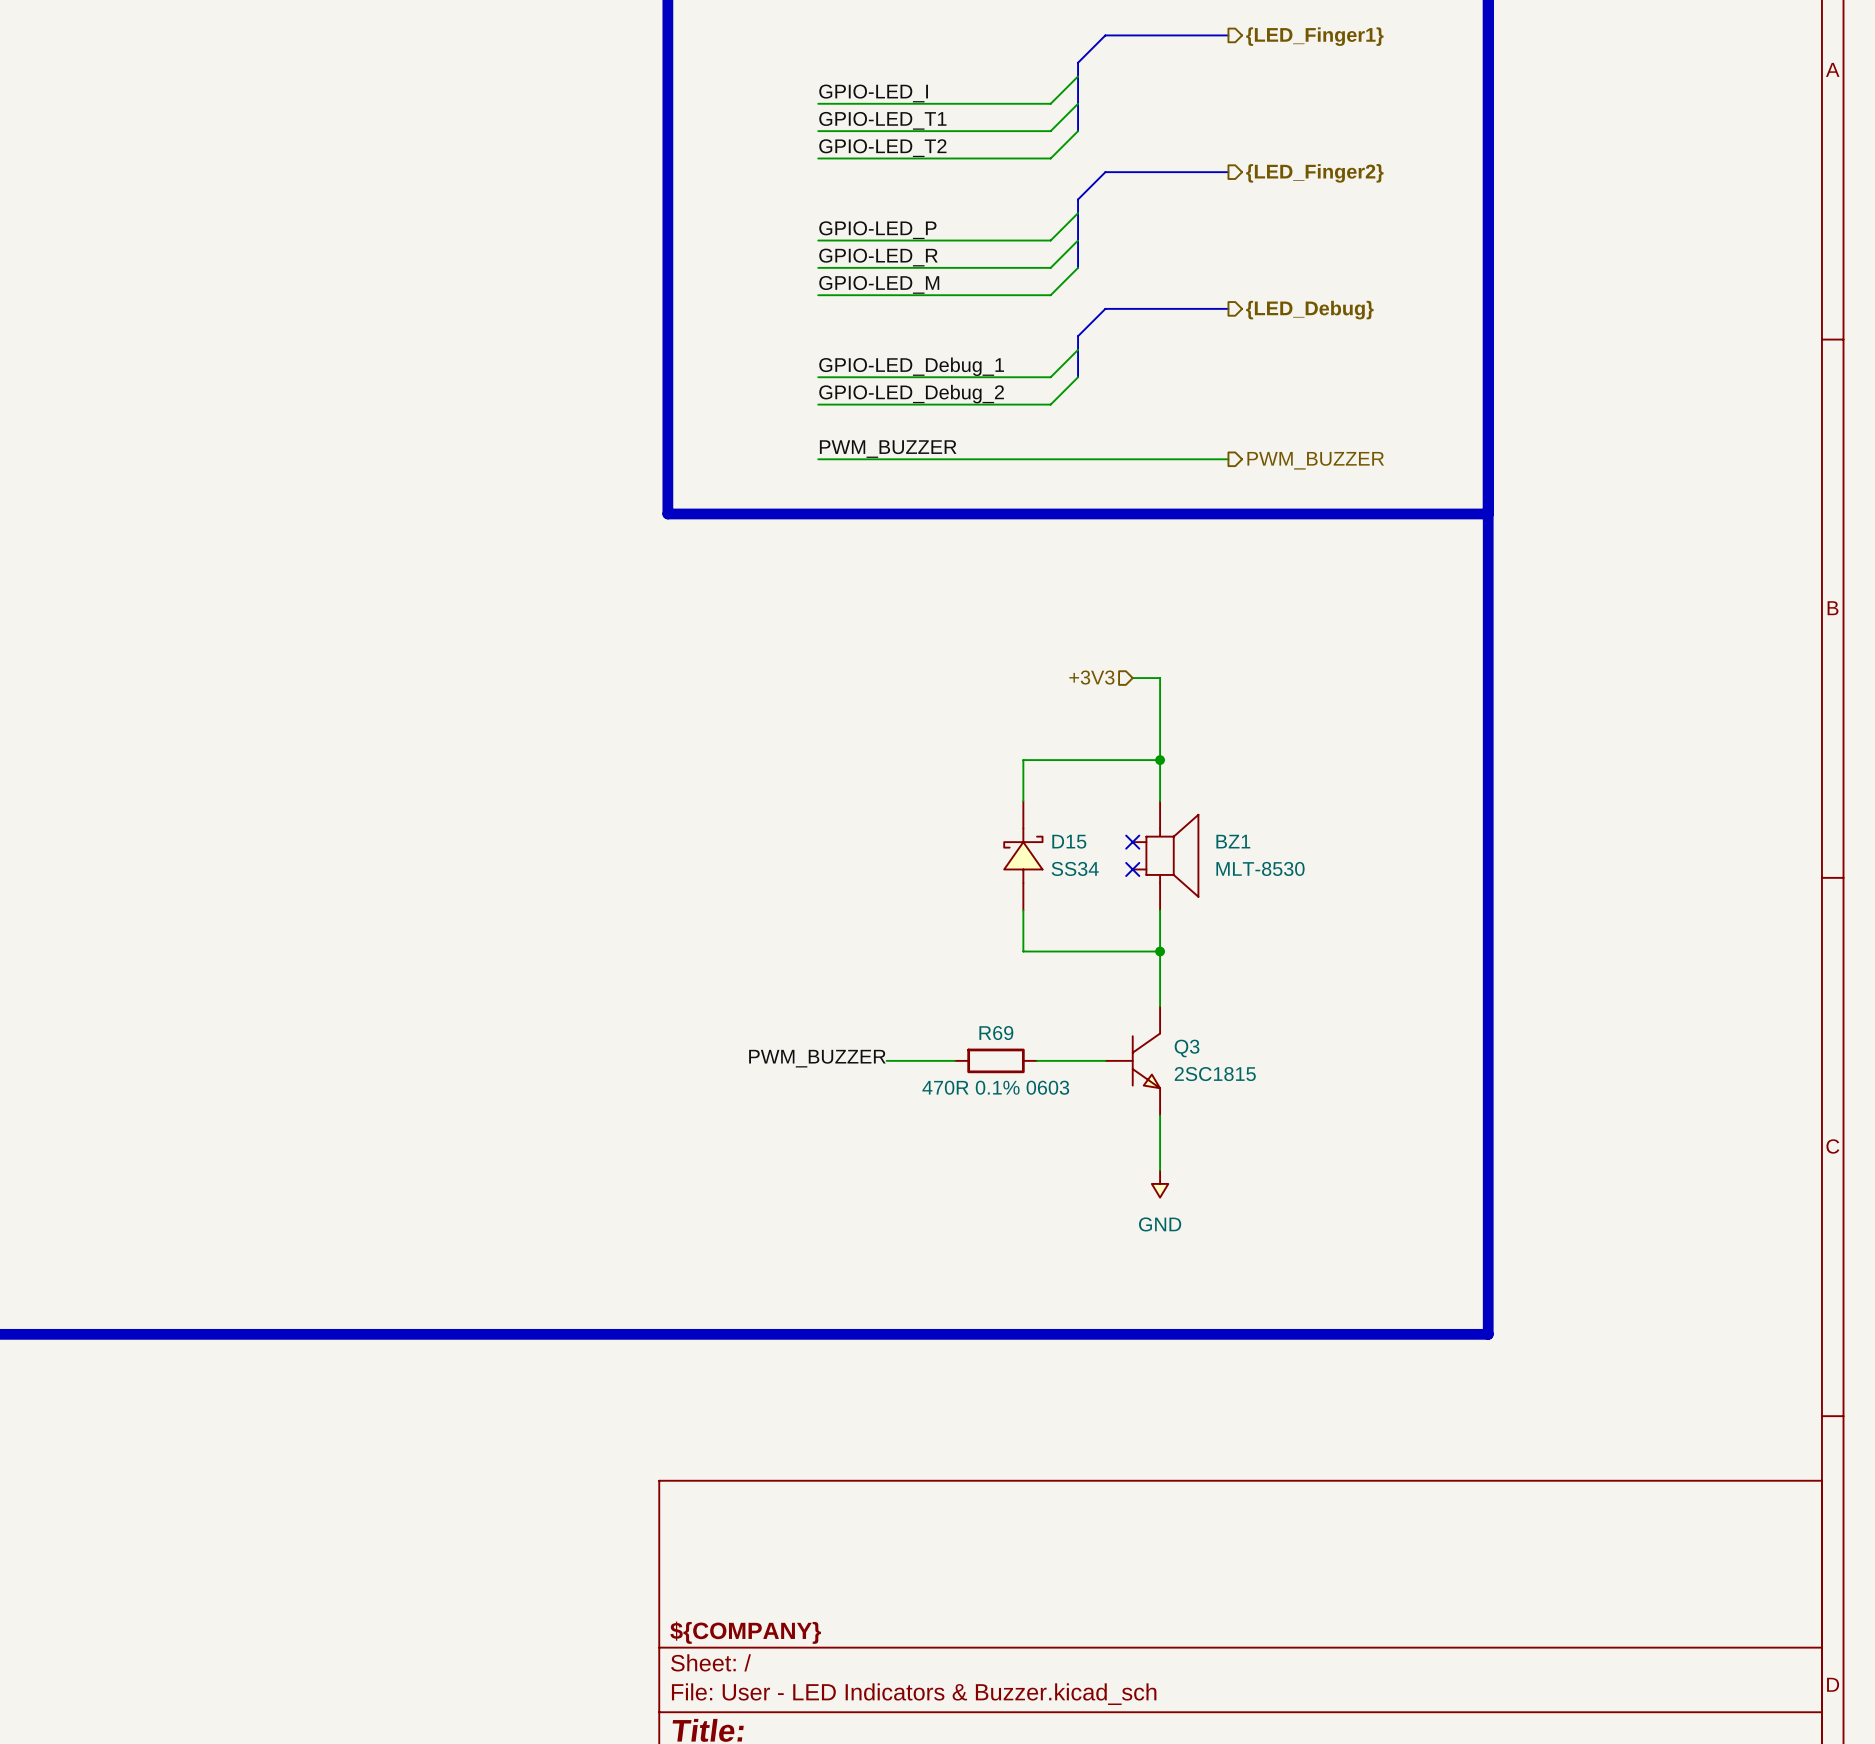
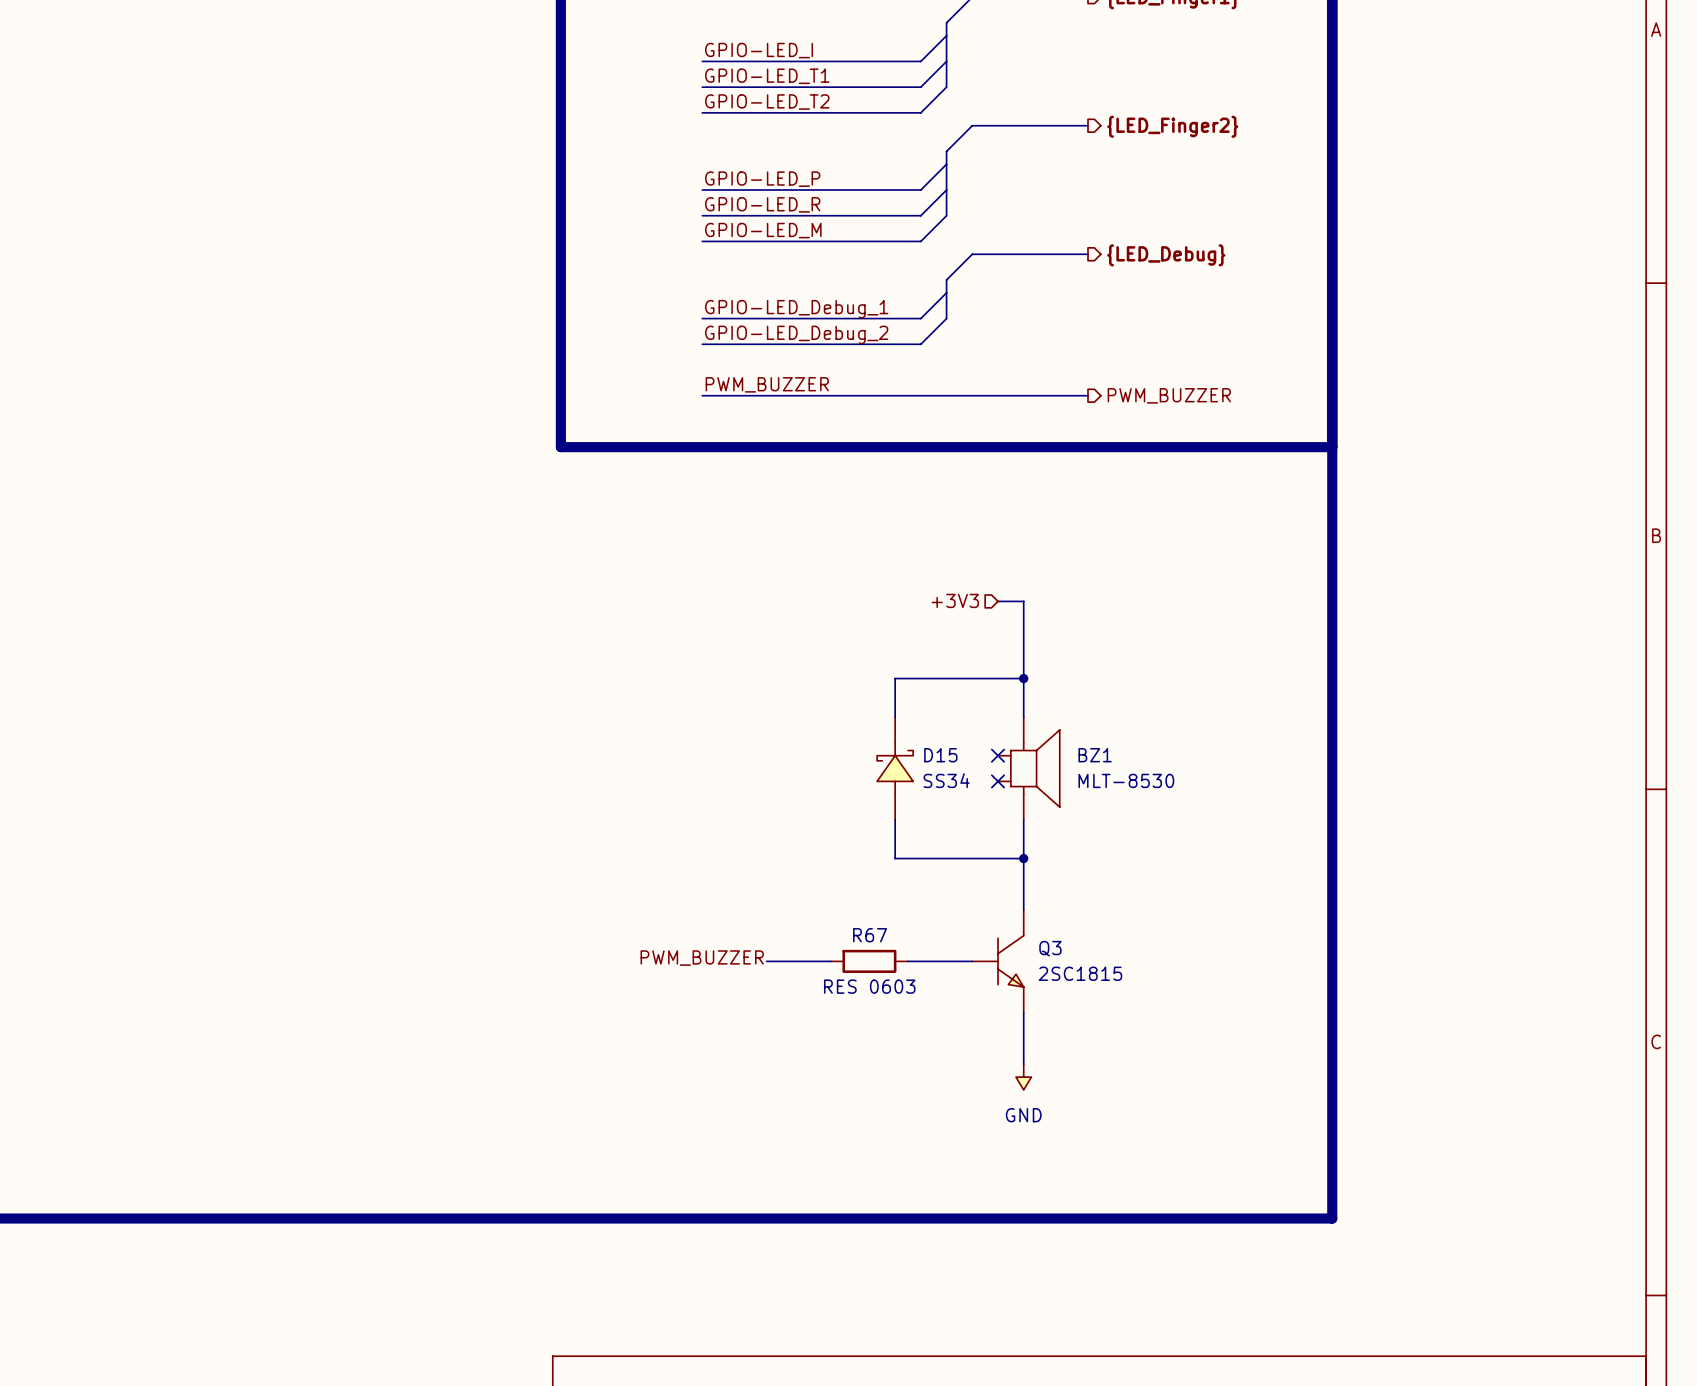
R69 name: R69 (996, 1033) -> R67 (870, 935)
R69 value: 470R 0.1% 0603 (995, 1087) -> RES 0603 (869, 986)

